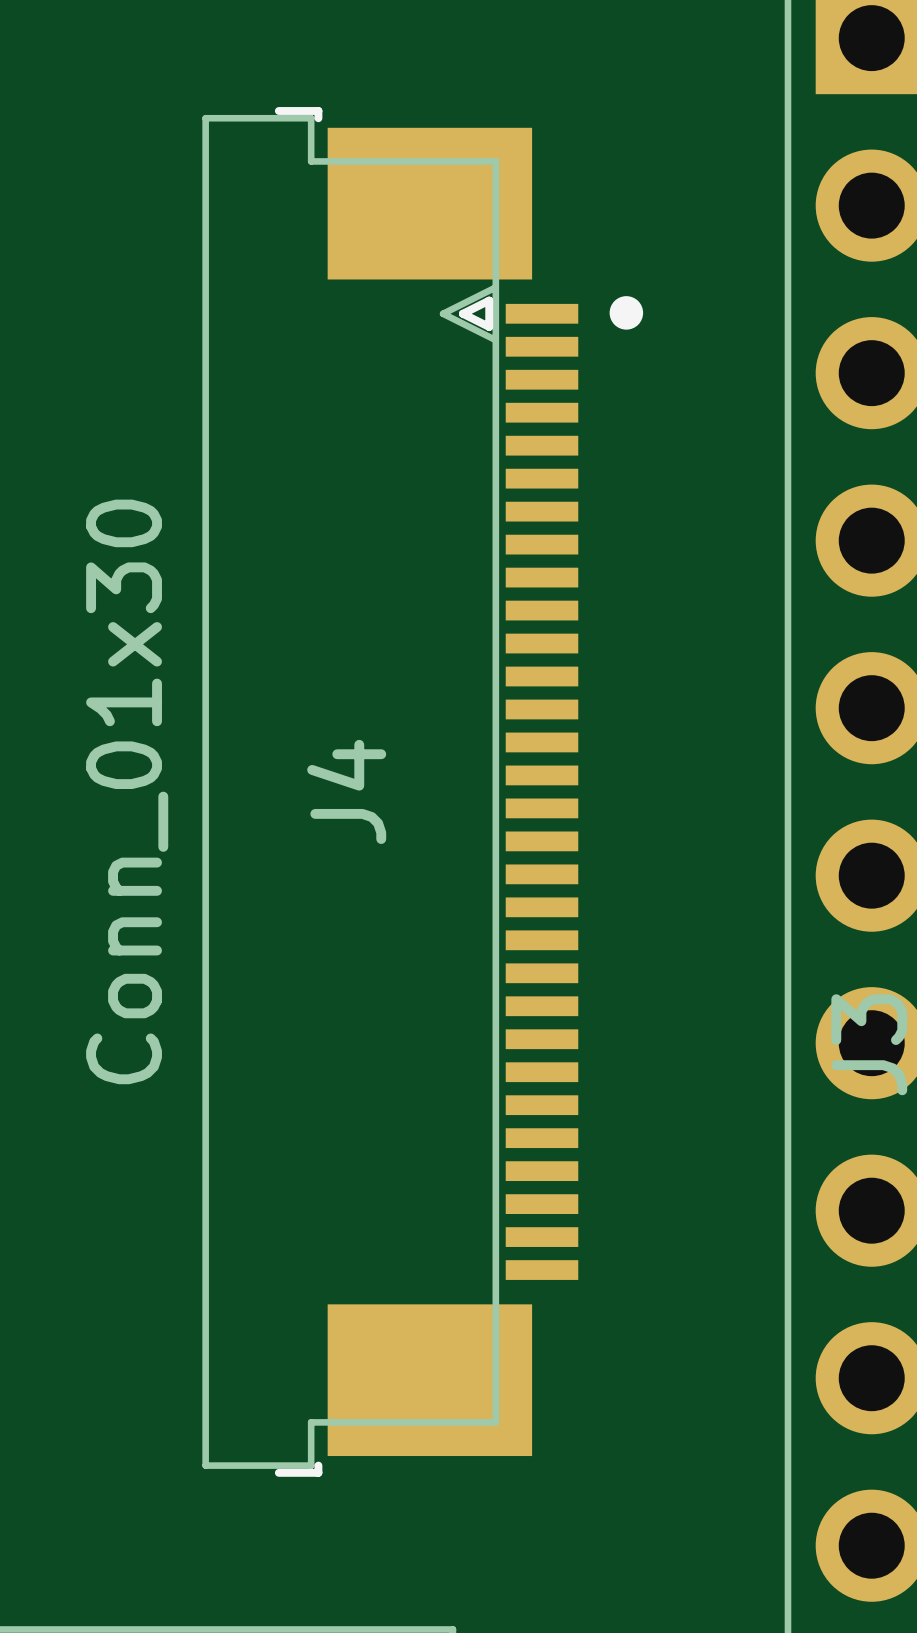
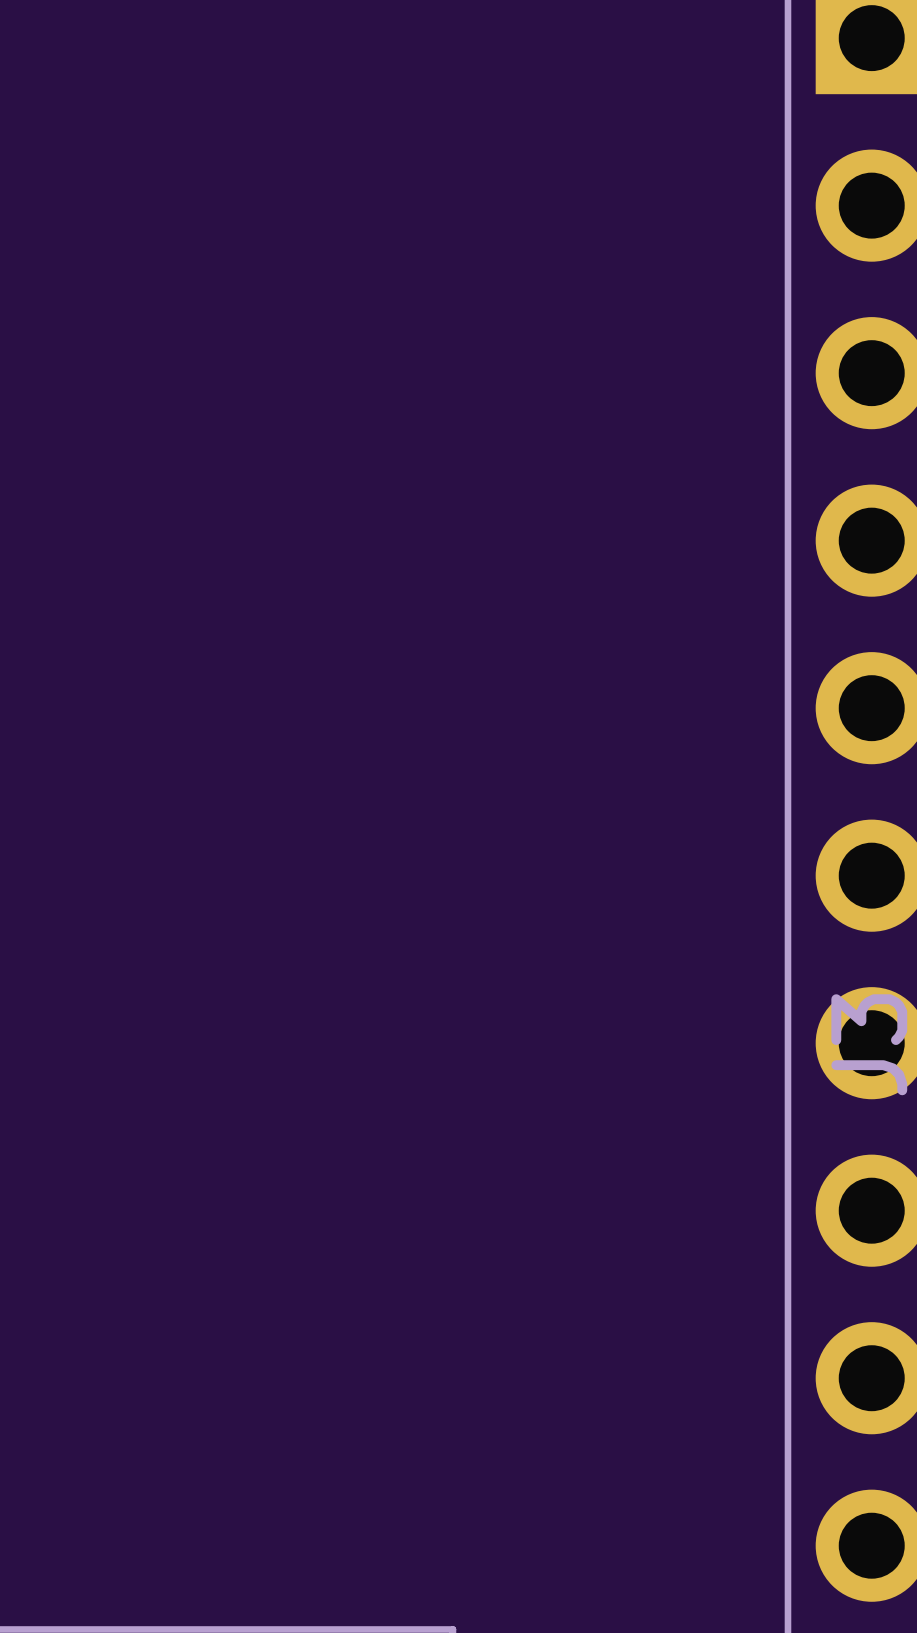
drawing: [609, 296, 644, 330] -> none
J4: Conn_01x30 (390, 791) -> none

